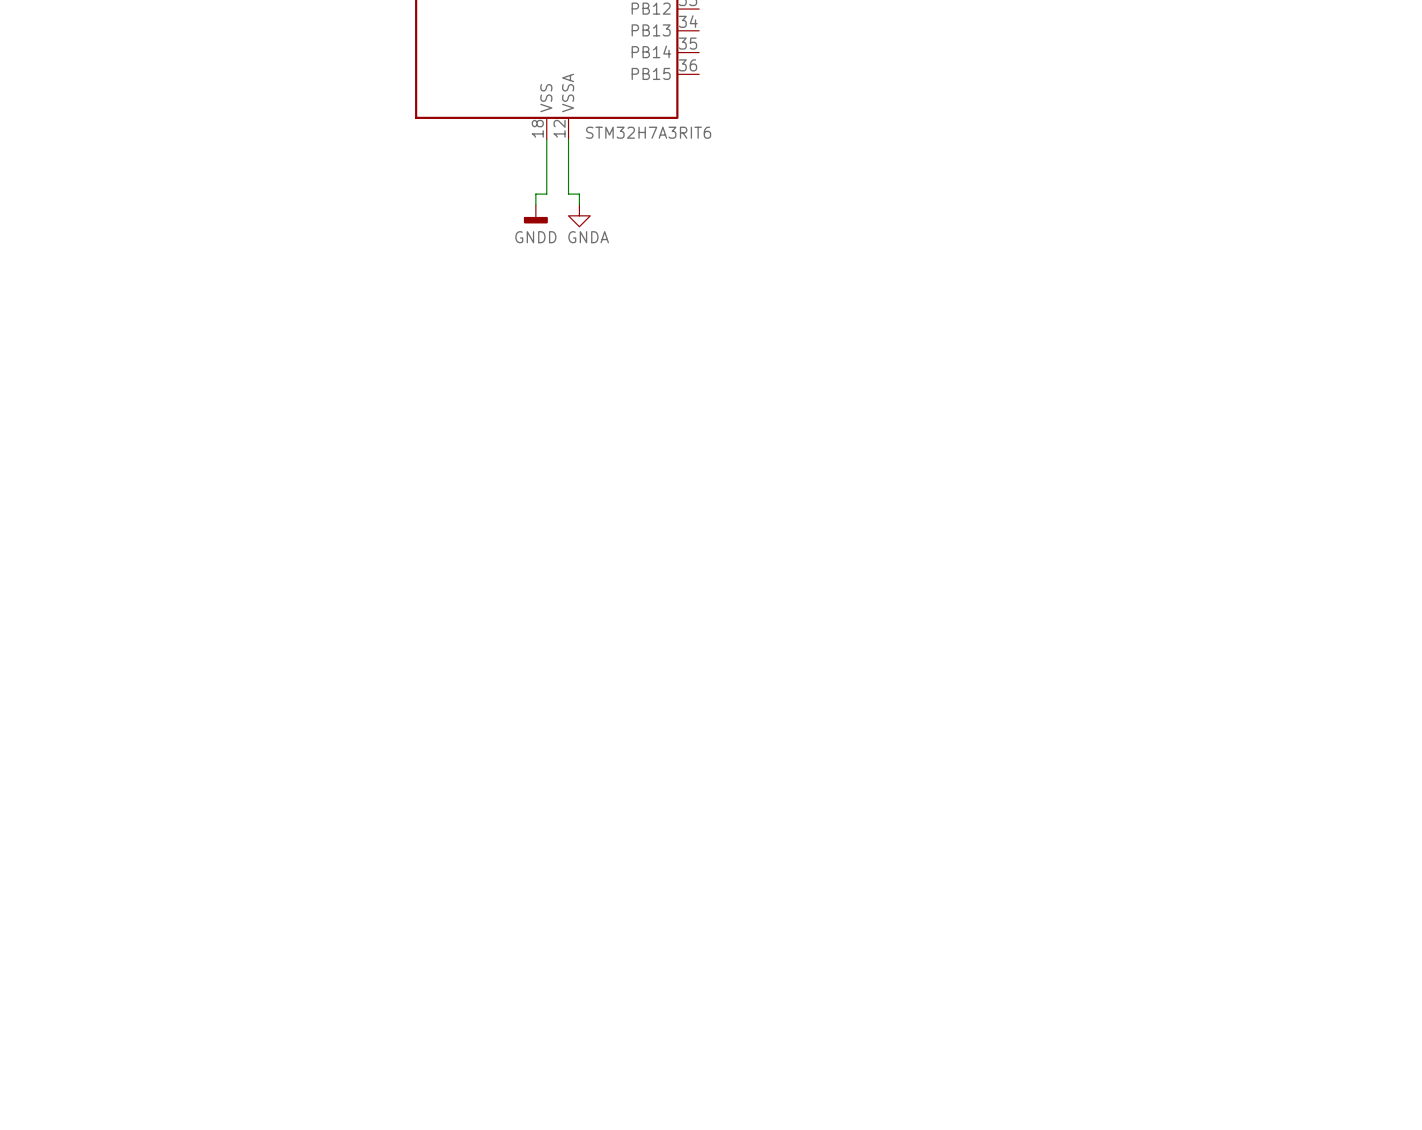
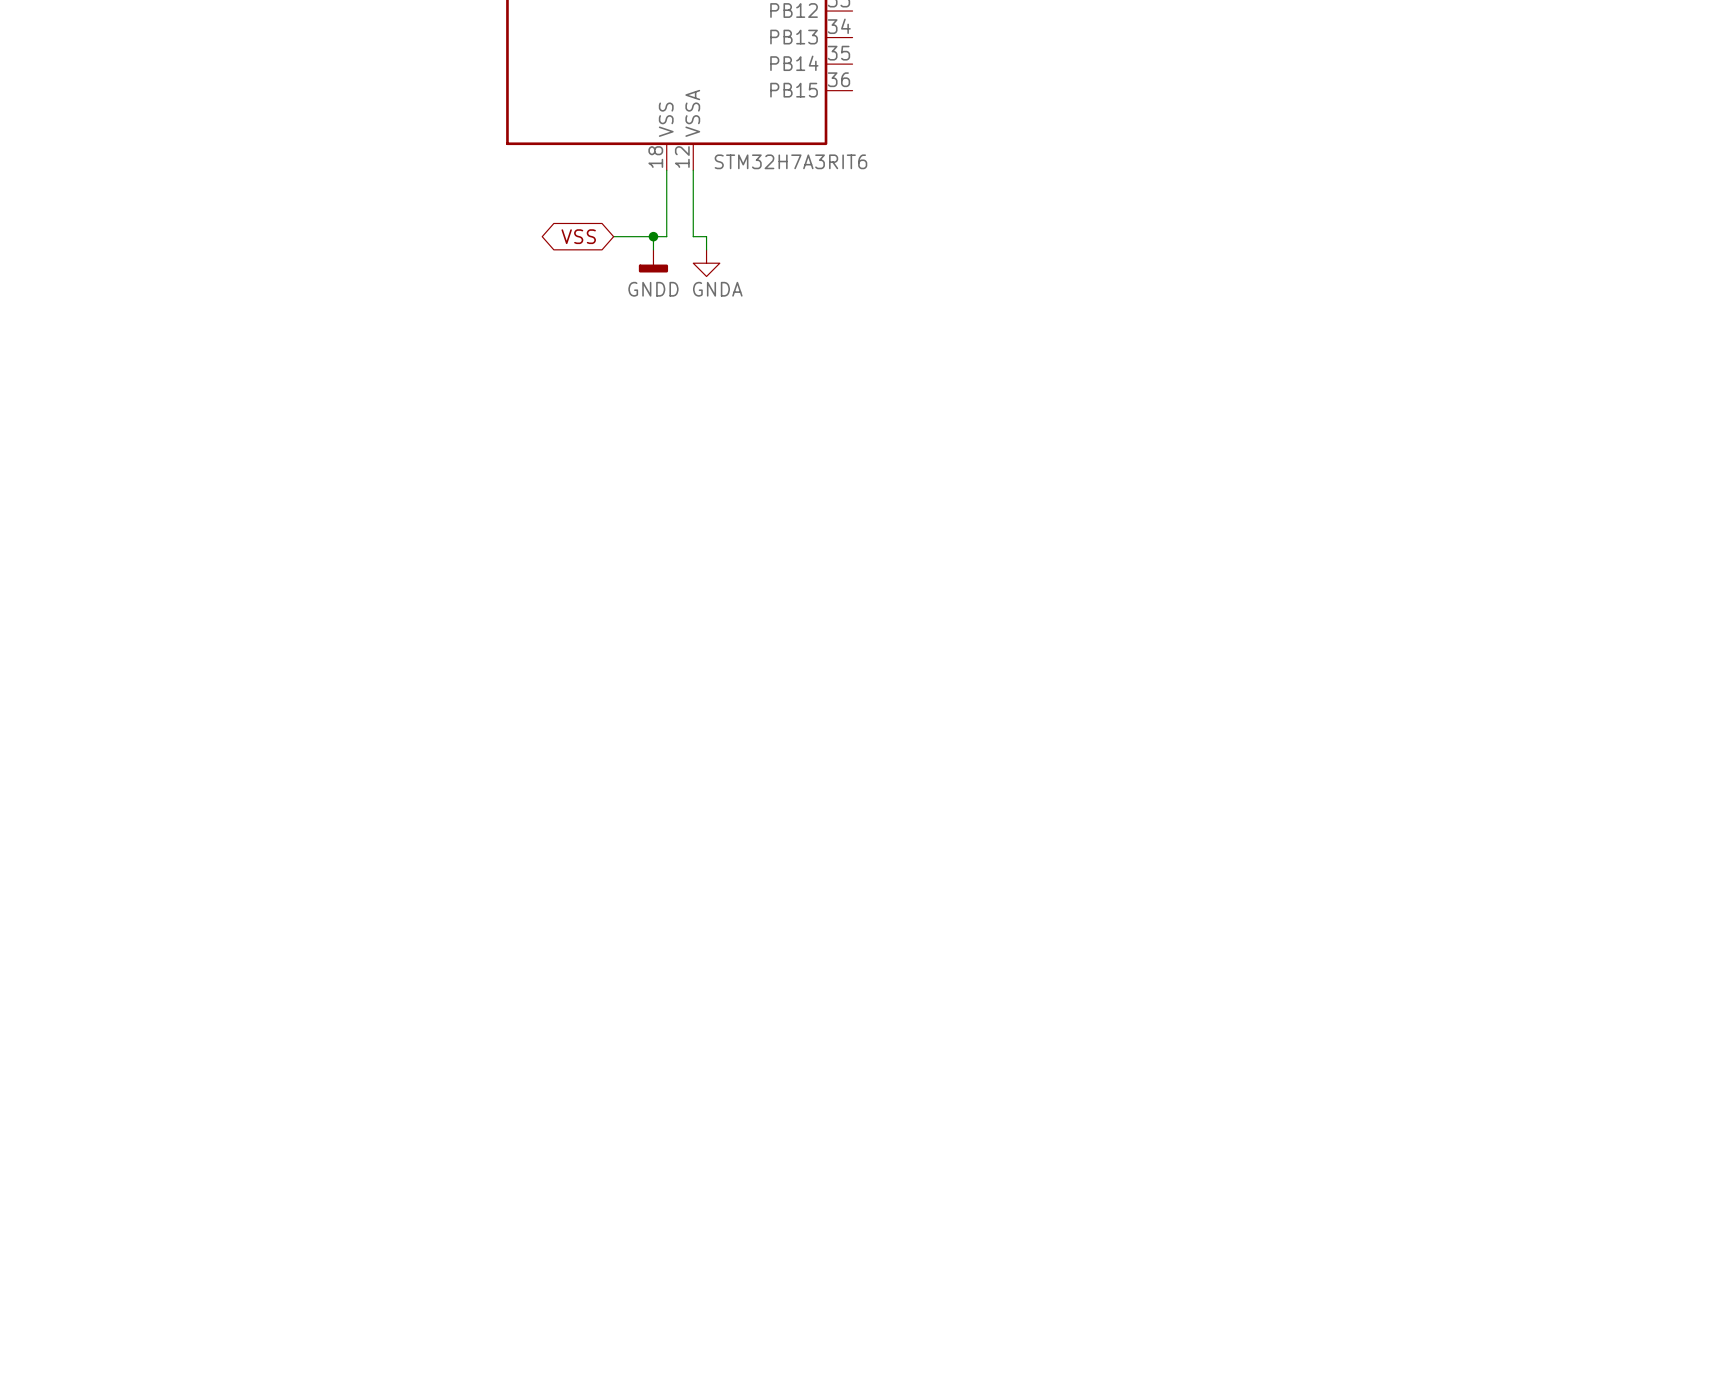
global label: none -> VSS (578, 236)
wire: none -> (613, 236) (653, 236)
junction: none -> (653, 236)

